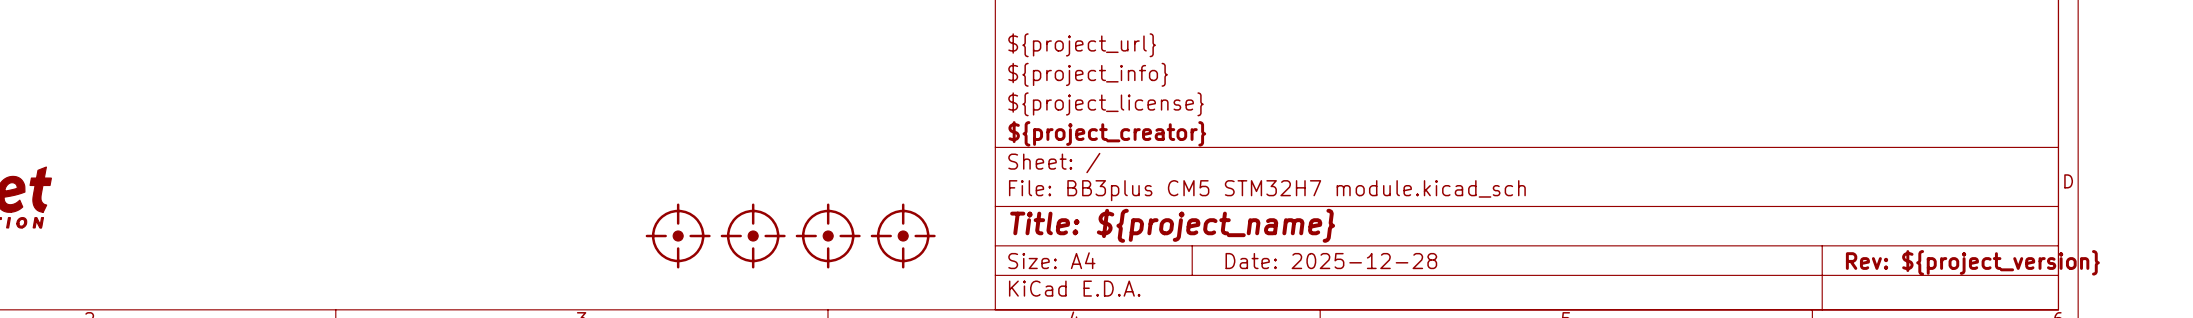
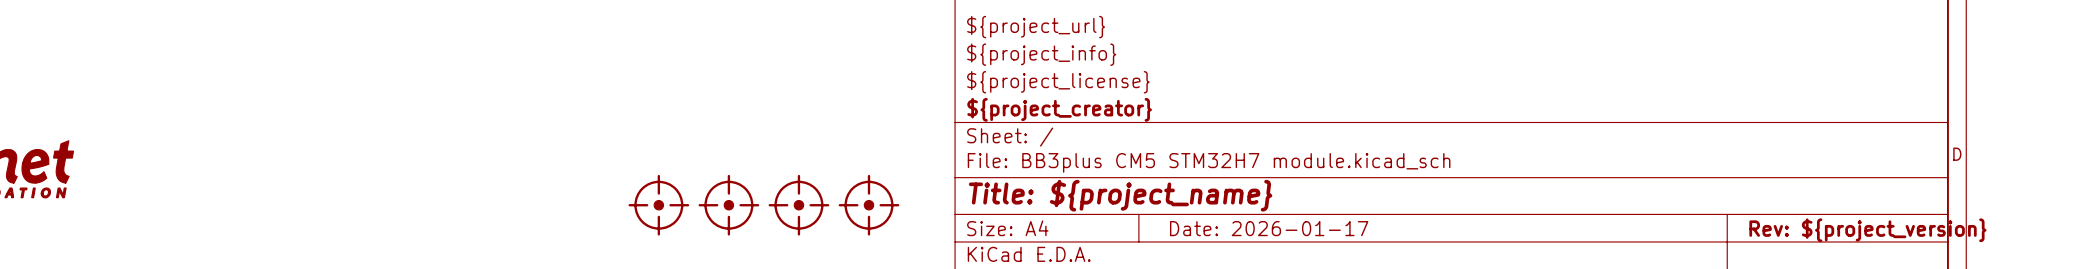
title block: Date: 2025-12-28 (1331, 261) -> Date: 2026-01-17 (1269, 228)

